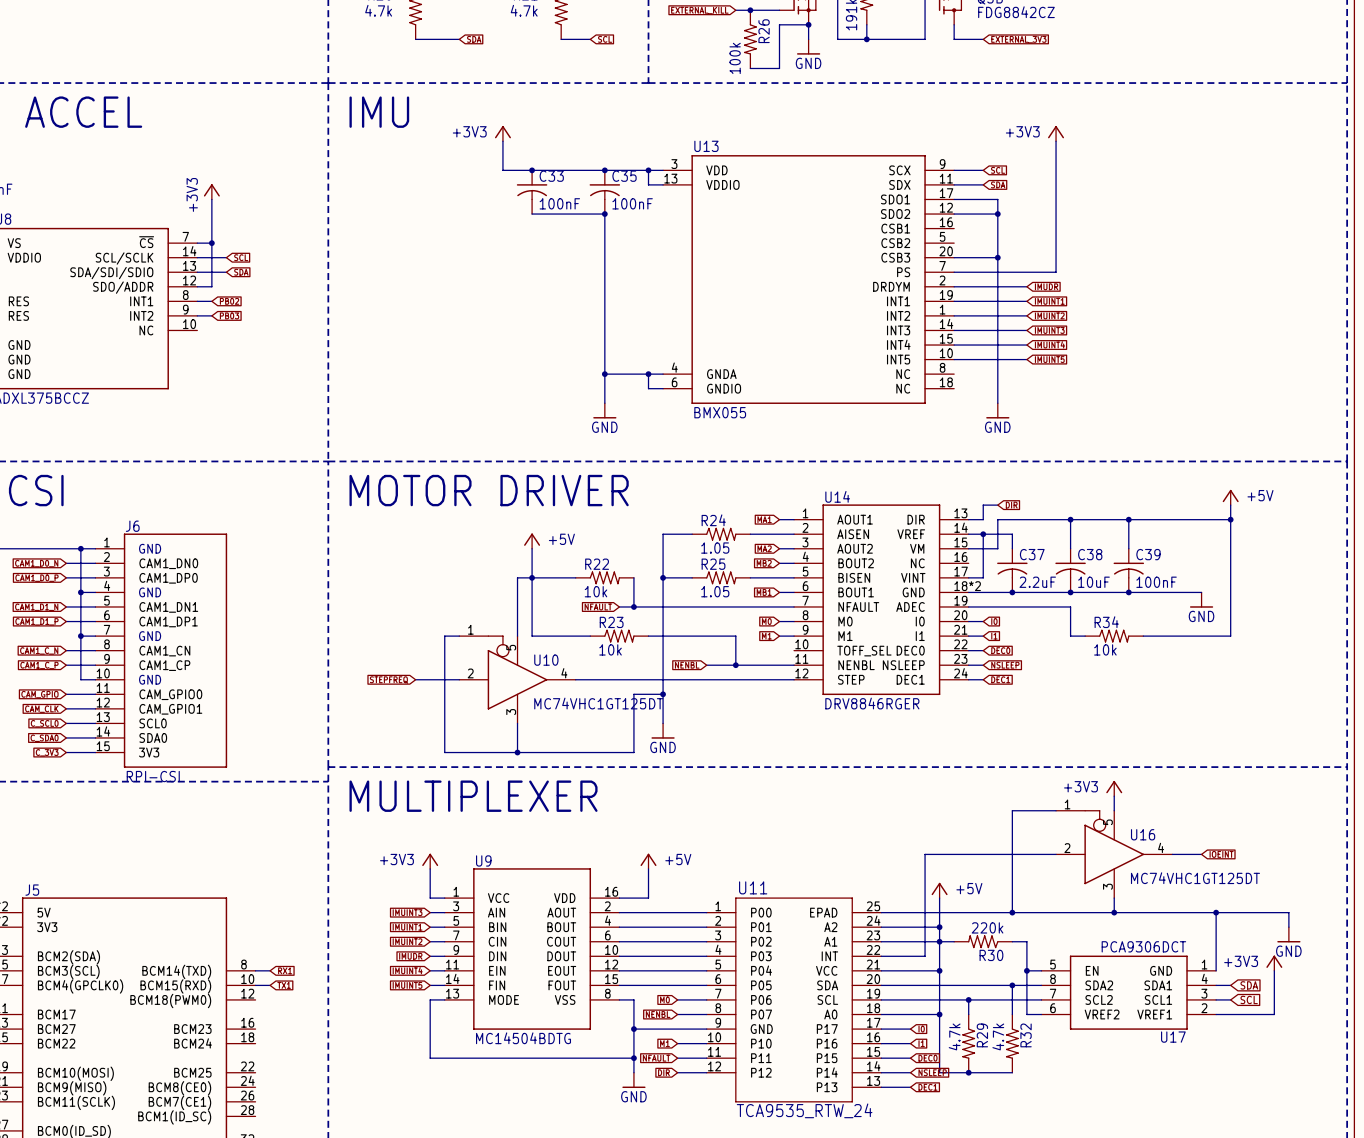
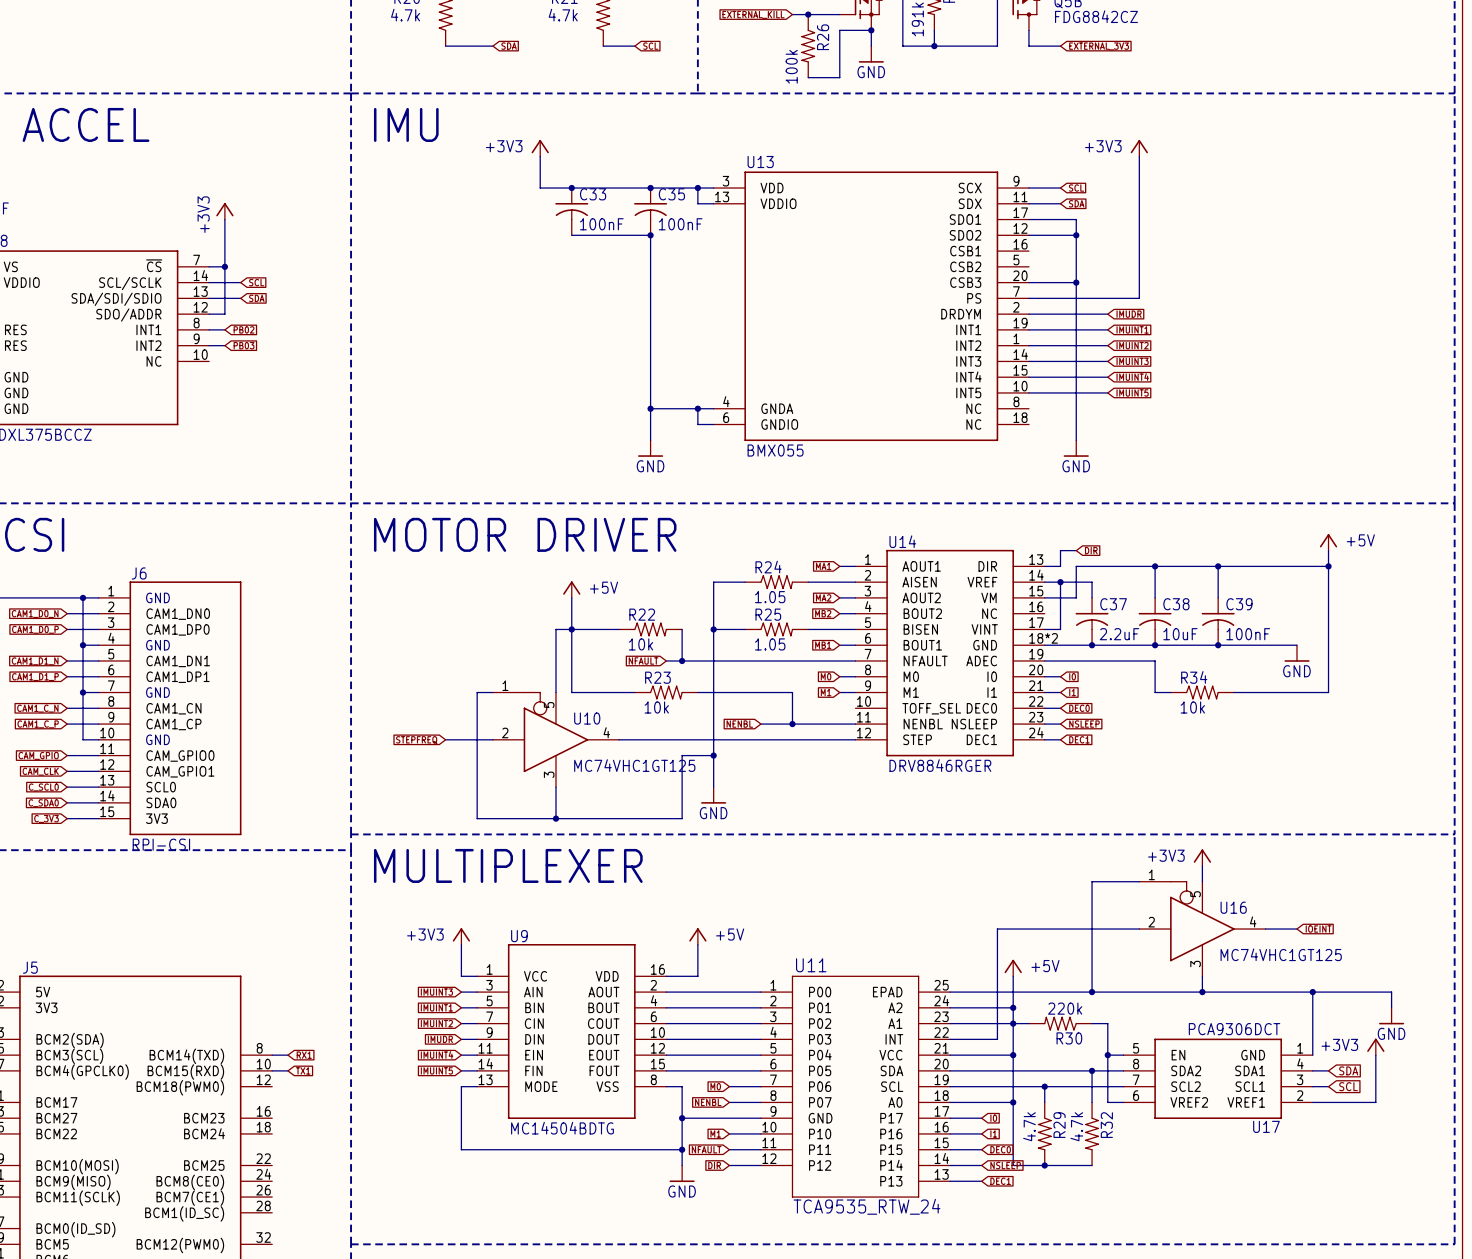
U10 value: MC74VHC1GT125DT (598, 703) -> MC74VHC1GT125 (634, 765)
U16 value: MC74VHC1GT125DT (1195, 878) -> MC74VHC1GT125 (1281, 954)

